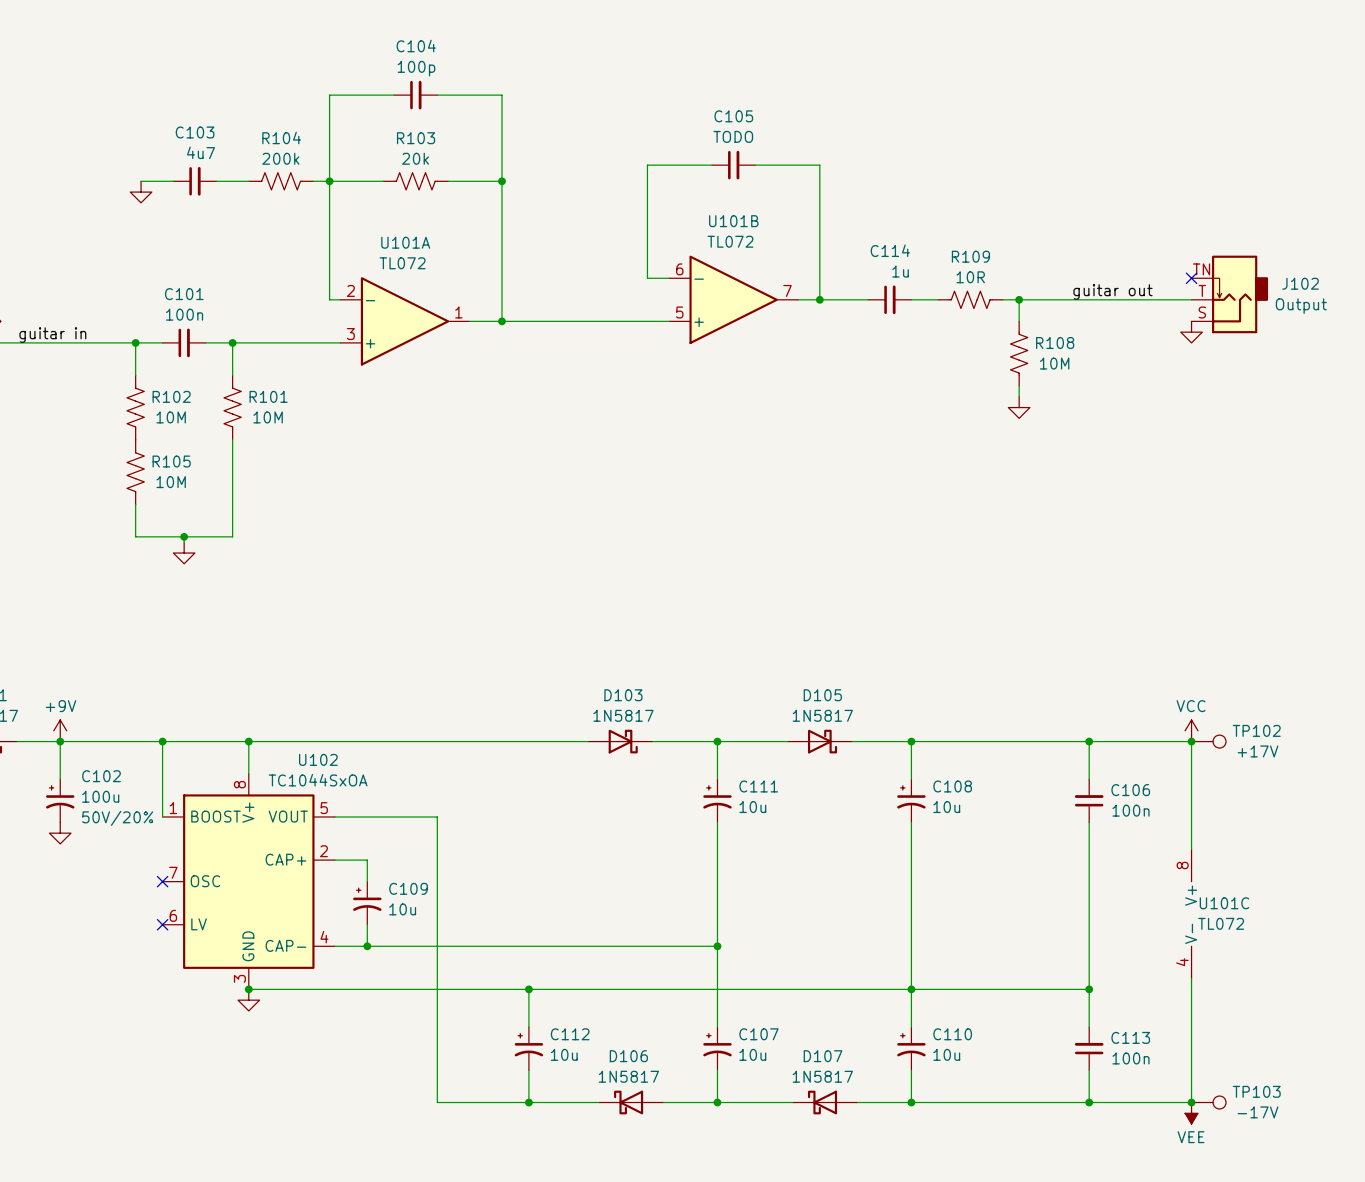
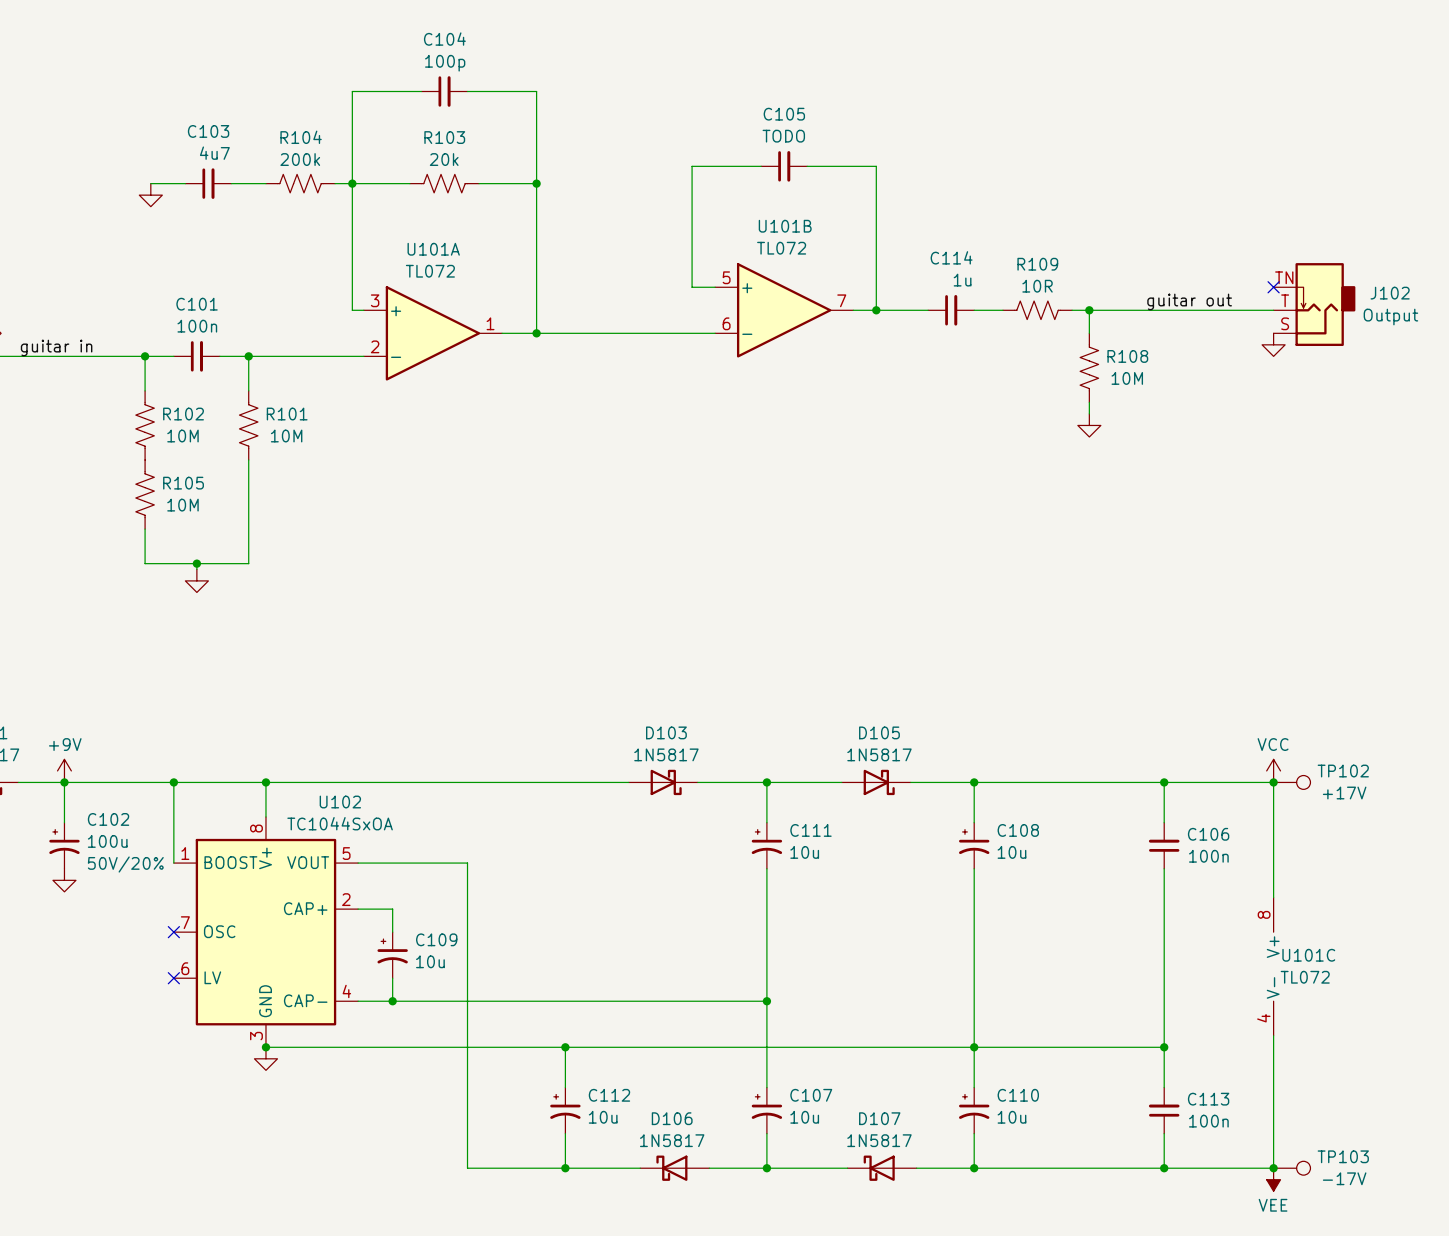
U101B flip: as is (733, 299) -> up-down (784, 310)
U101A flip: as is (405, 321) -> up-down (432, 333)

